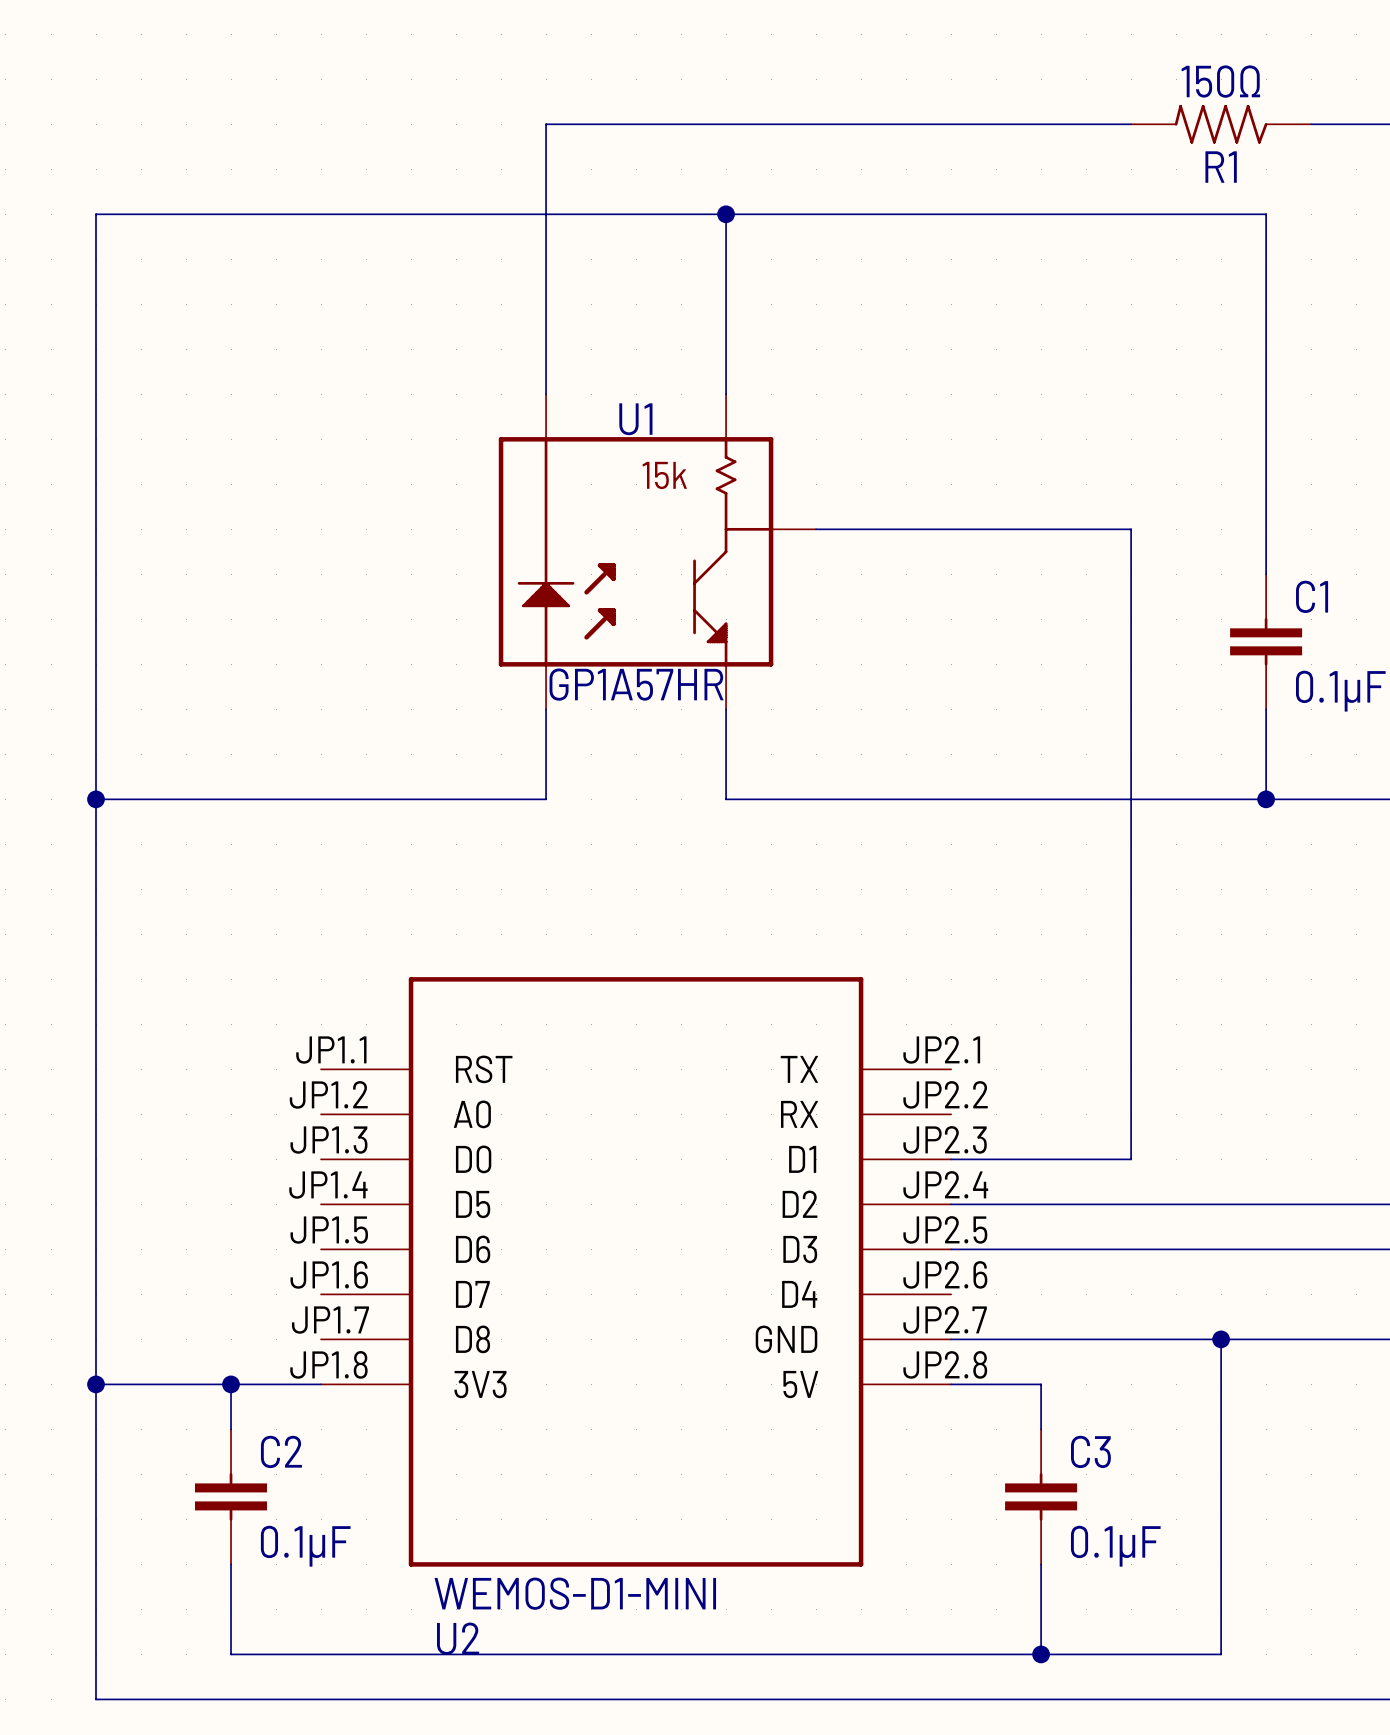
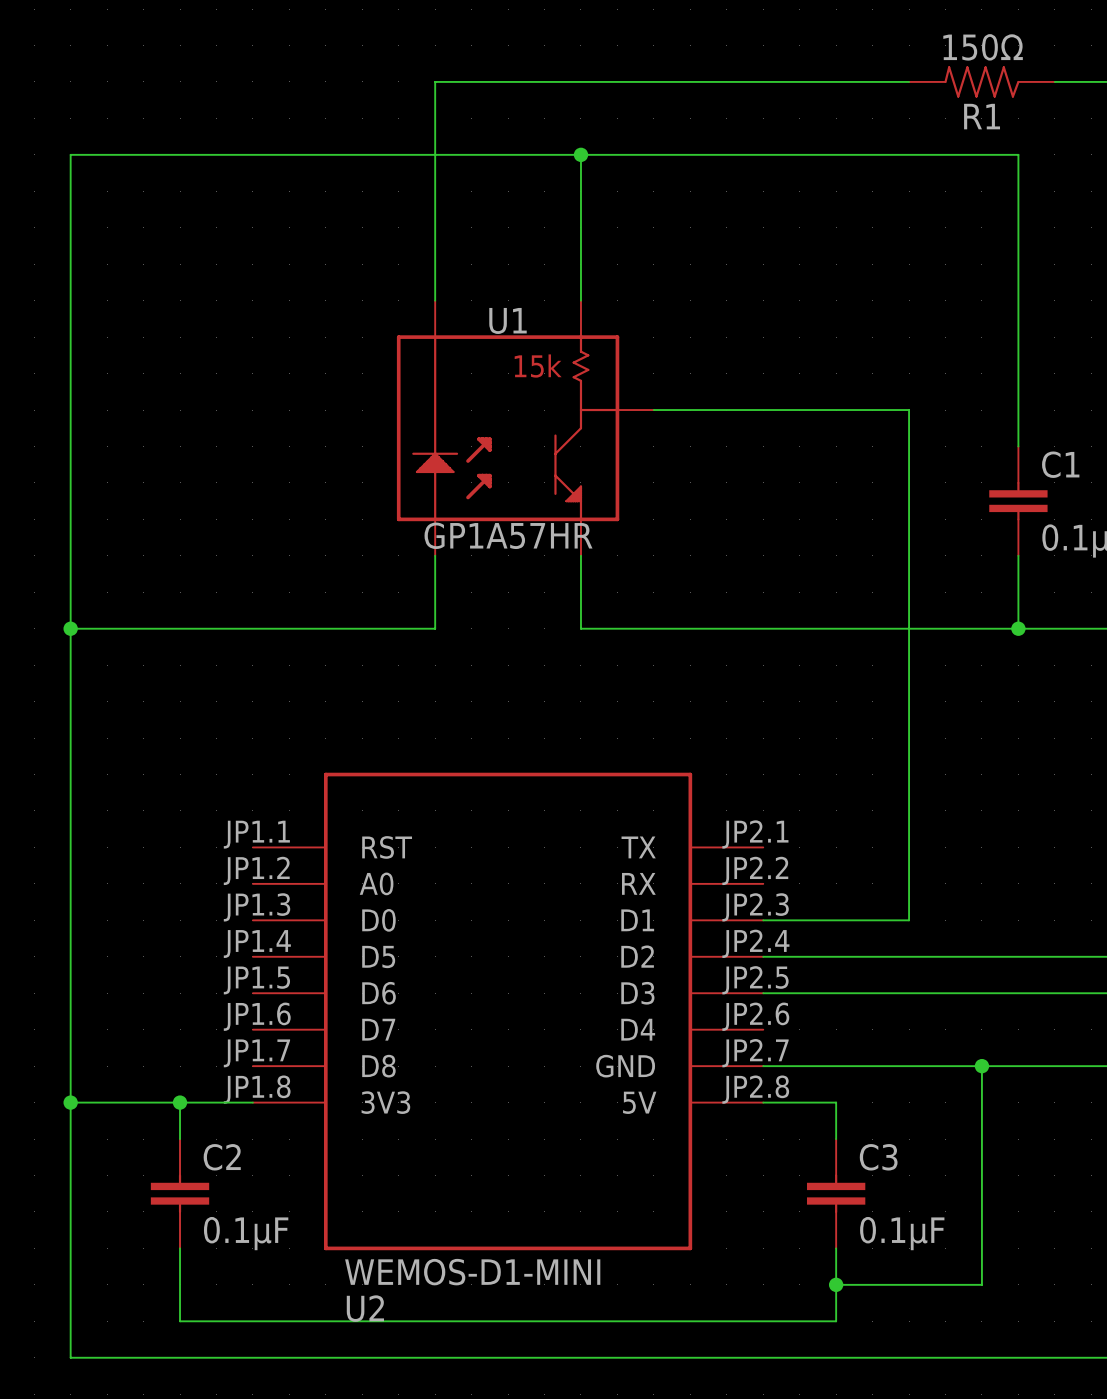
wire: (1221, 1609) (1221, 1654) (1041, 1654) -> (981, 1284) (836, 1284)
junction position: (1041, 1654) -> (836, 1284)

